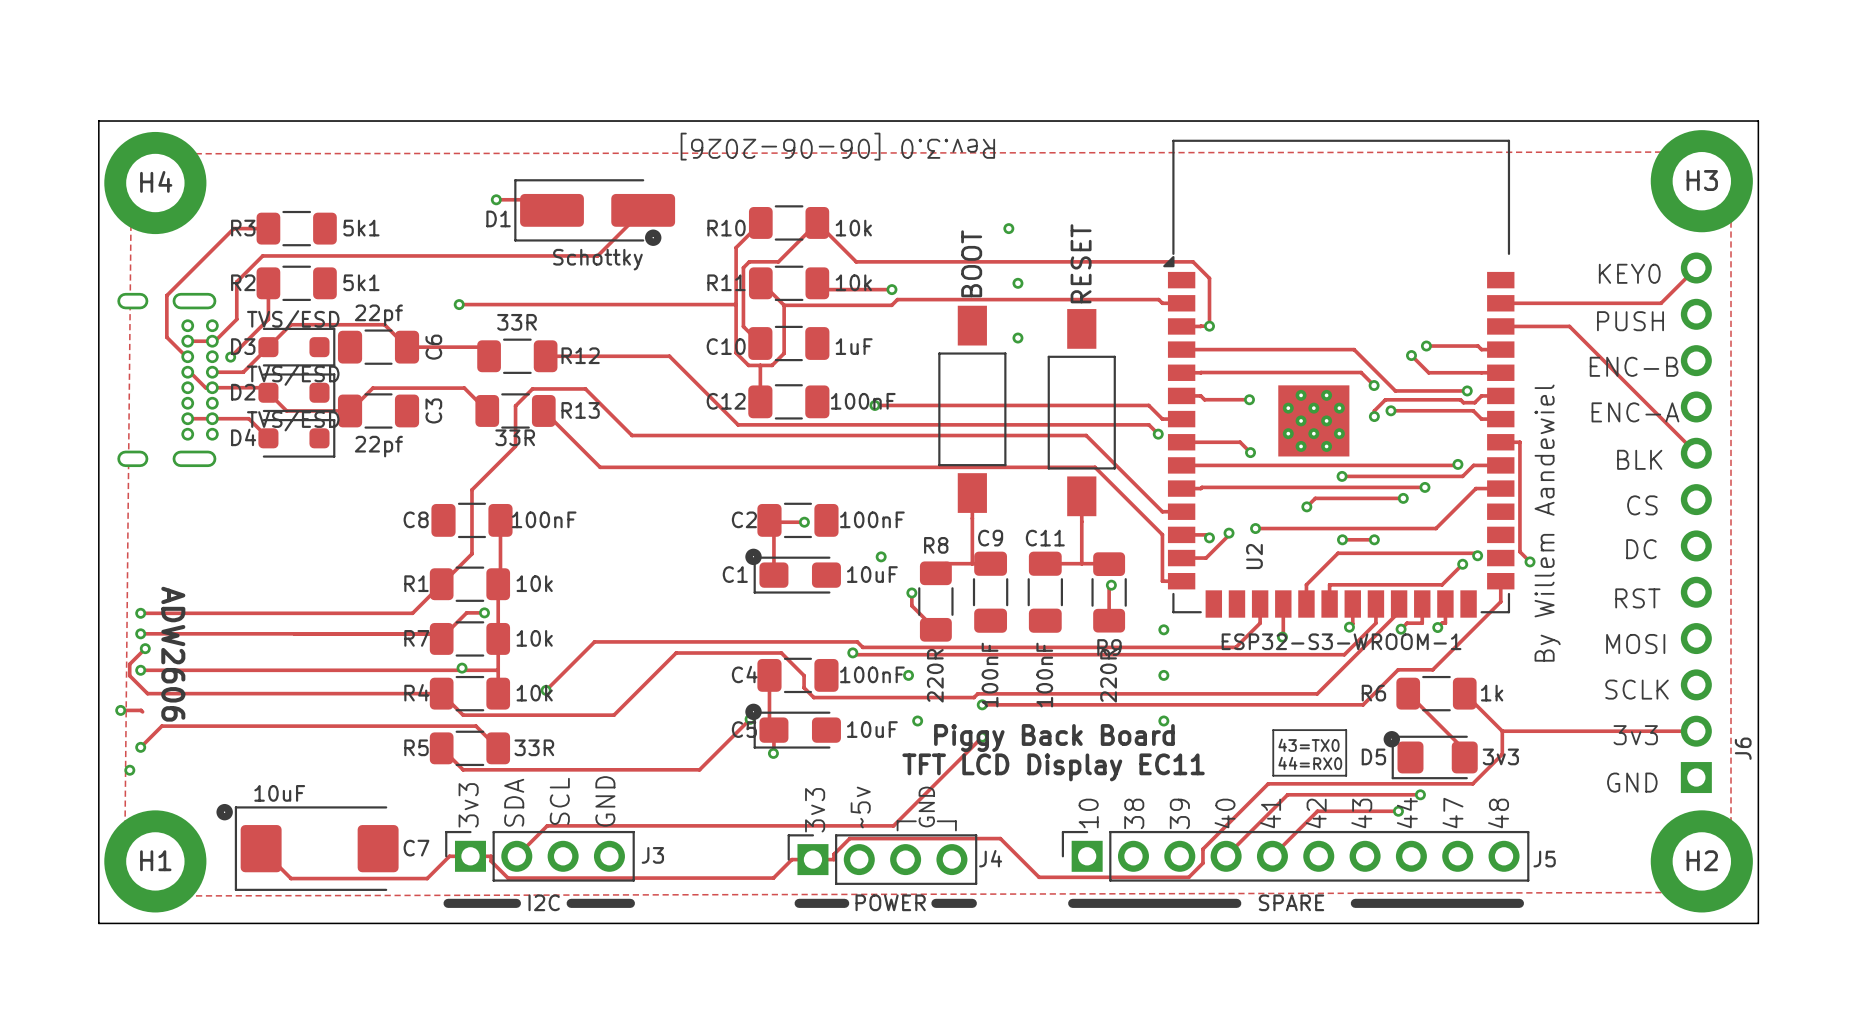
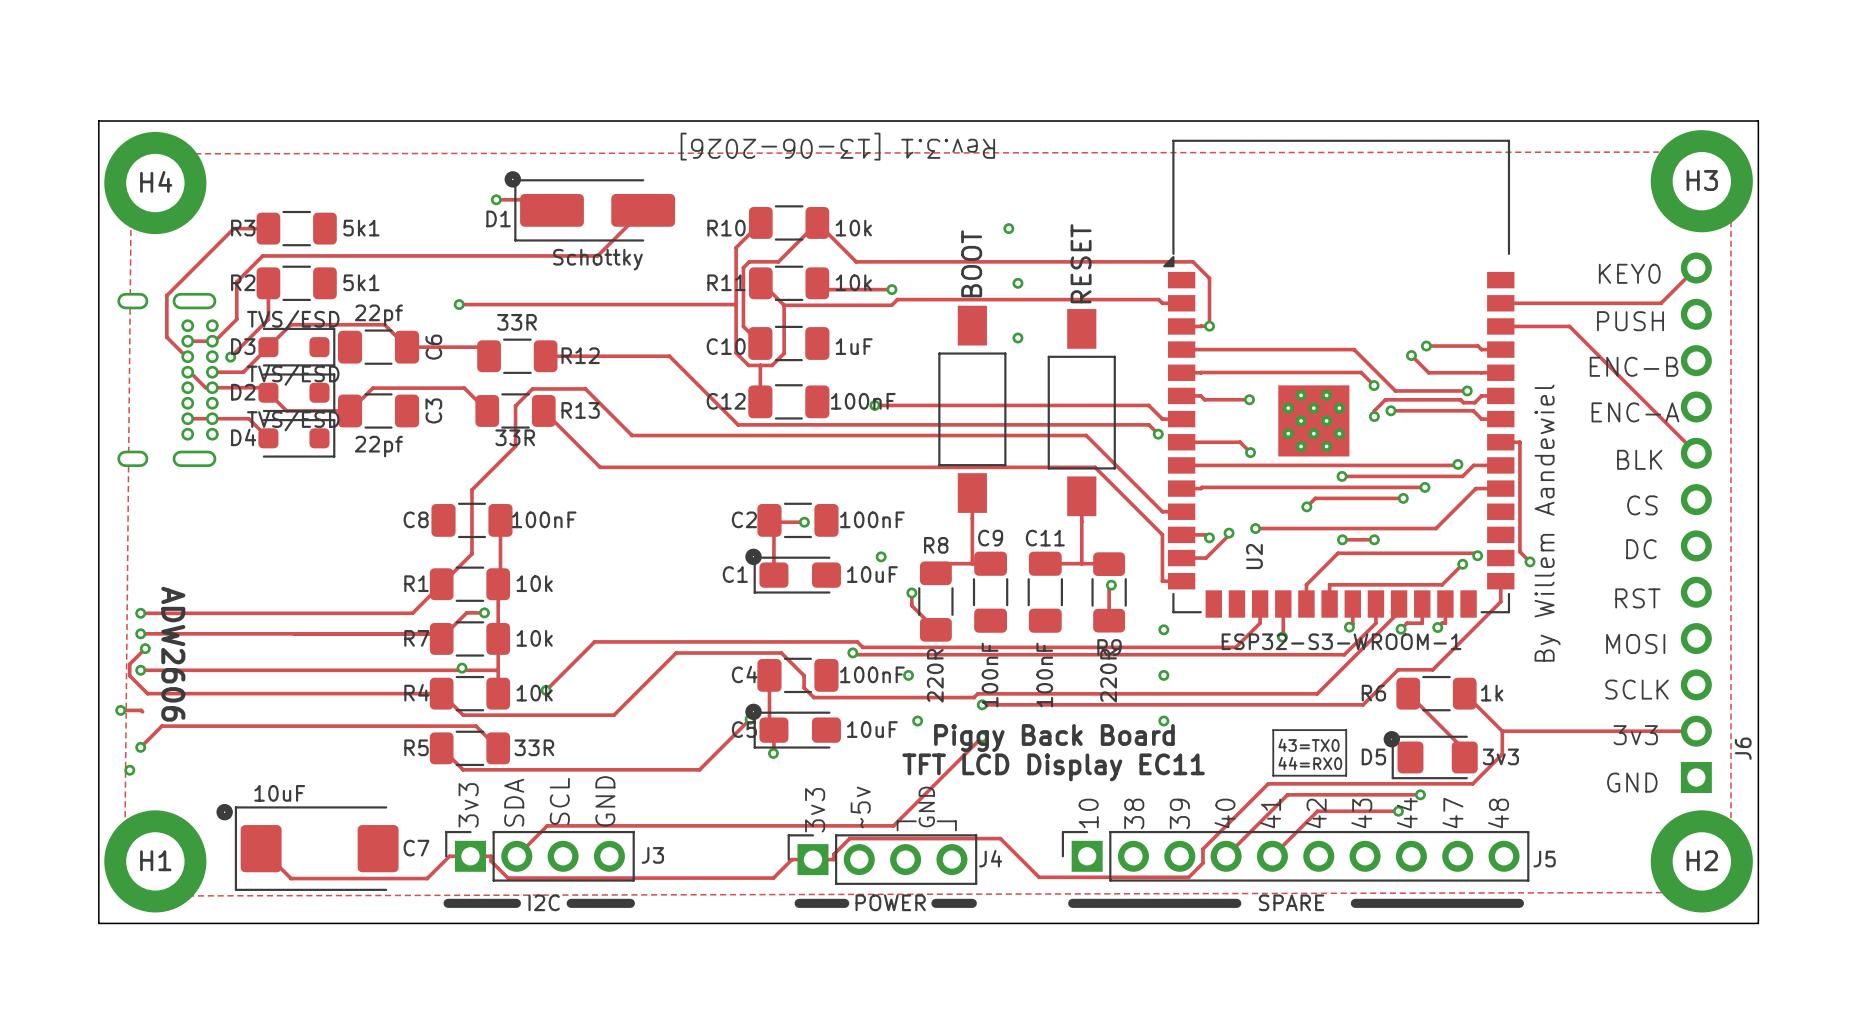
text: Rev.3.0 [06-06-2026] (837, 146) -> Rev.3.1 [13-06-2026] (837, 146)
drawing position: (653, 237) -> (512, 179)

